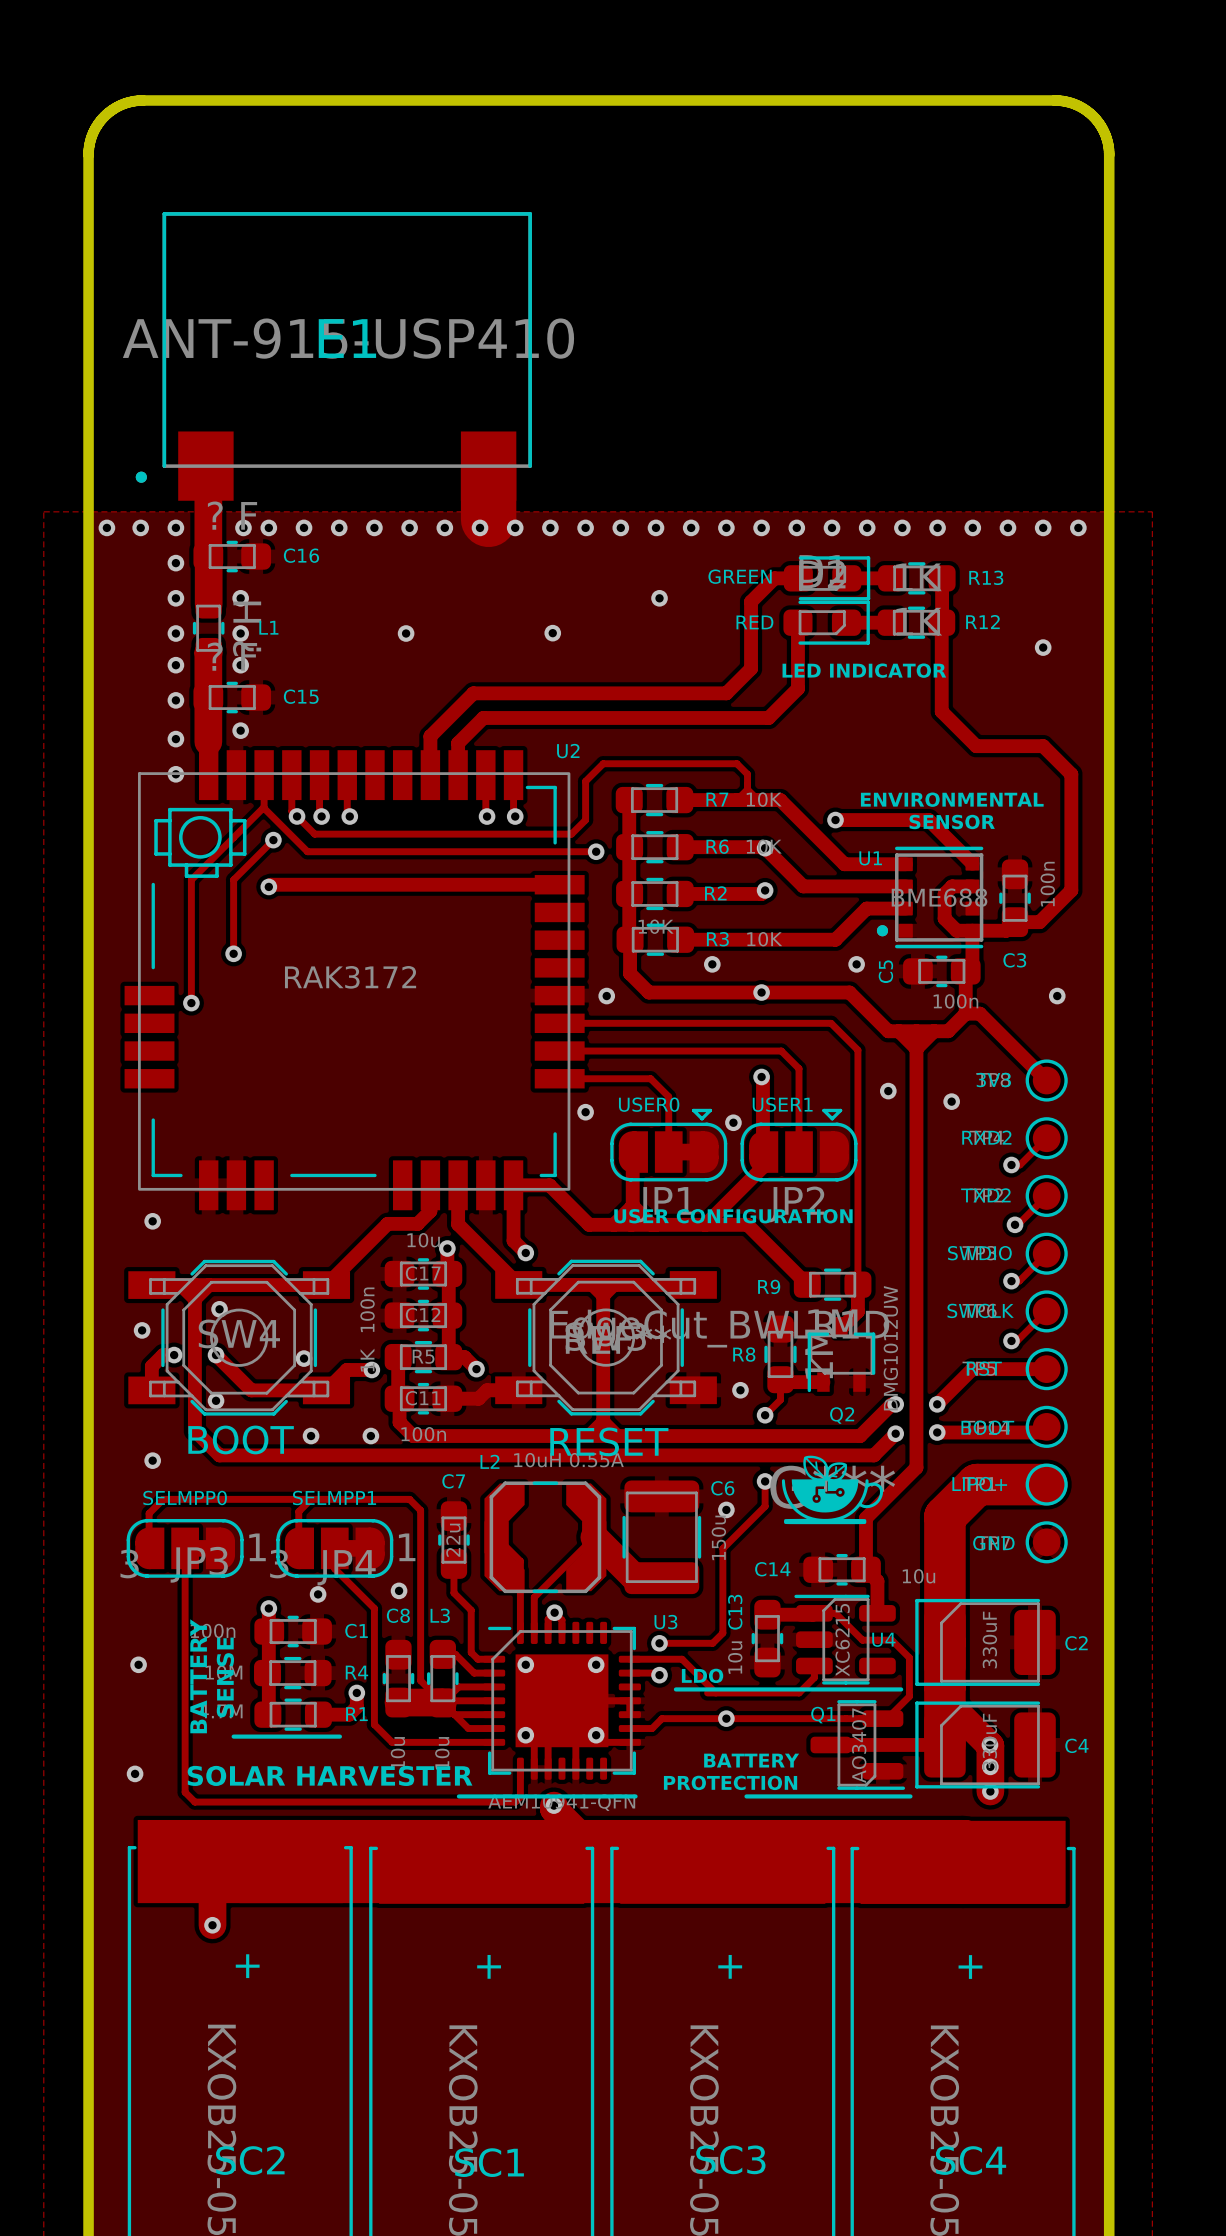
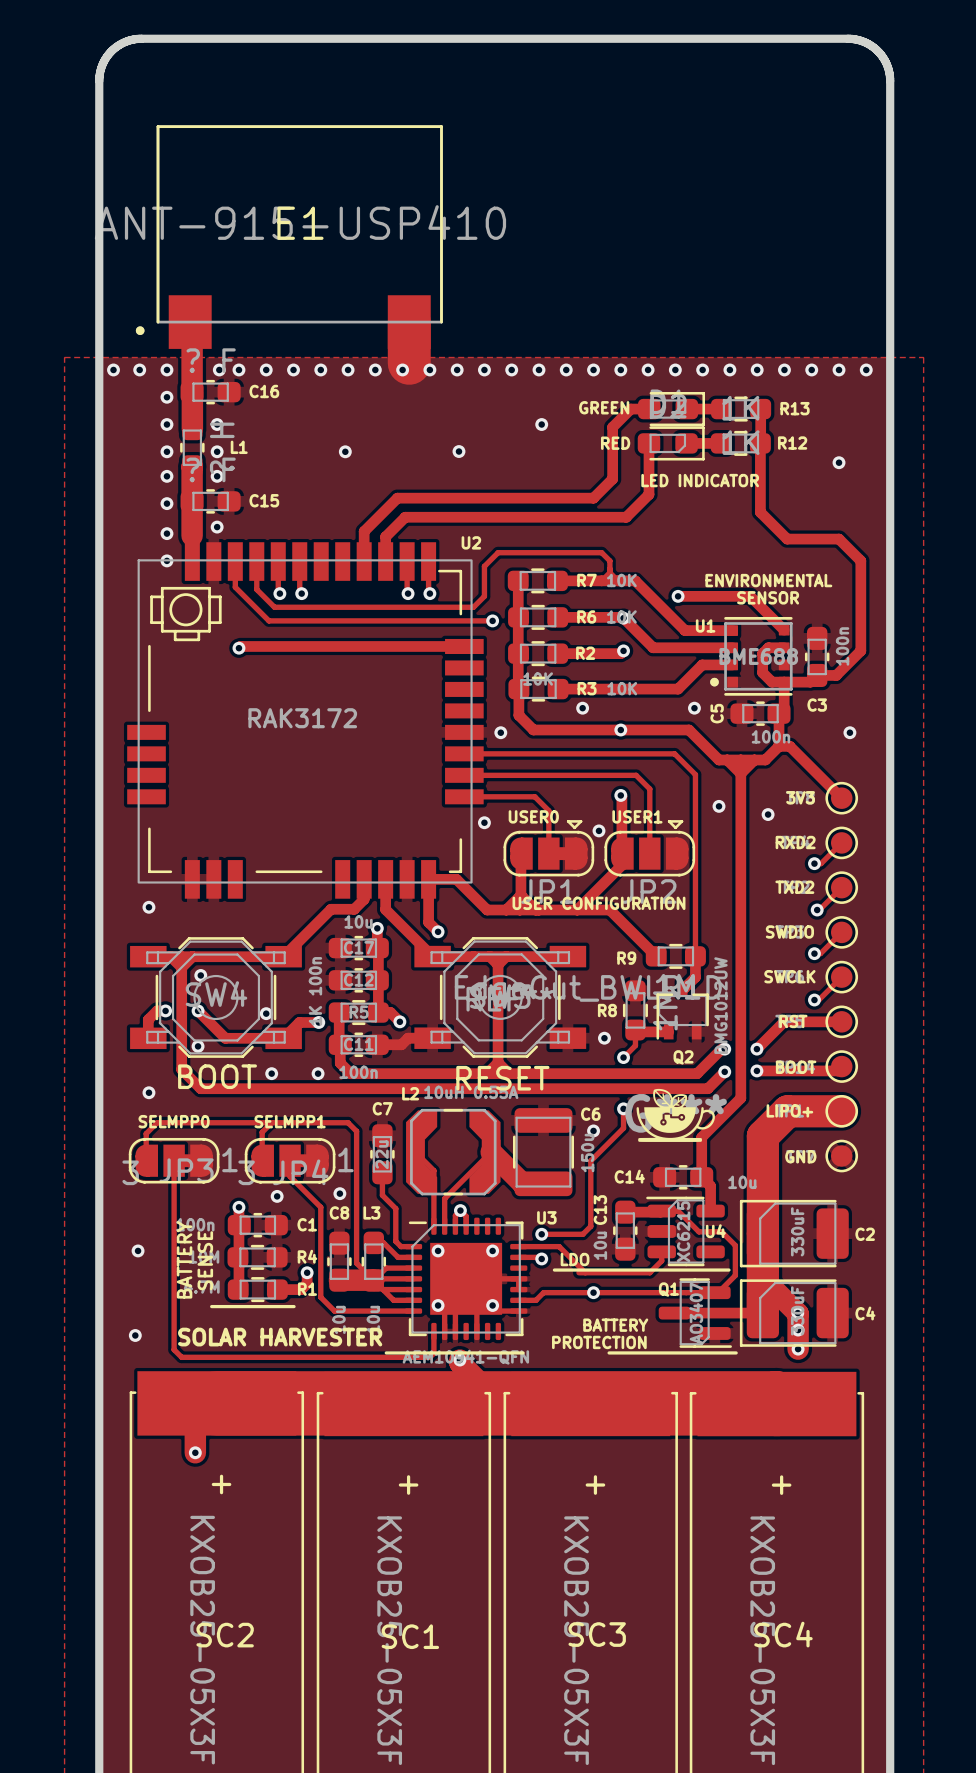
track: (264, 808) (191, 879) (191, 1003) -> none
via: (297, 816) -> none
track: (273, 840) (233, 879) (233, 953) -> none
via: (273, 840) -> none
via: (233, 953) -> none
via: (191, 1003) -> none
via: (142, 1330) -> none

